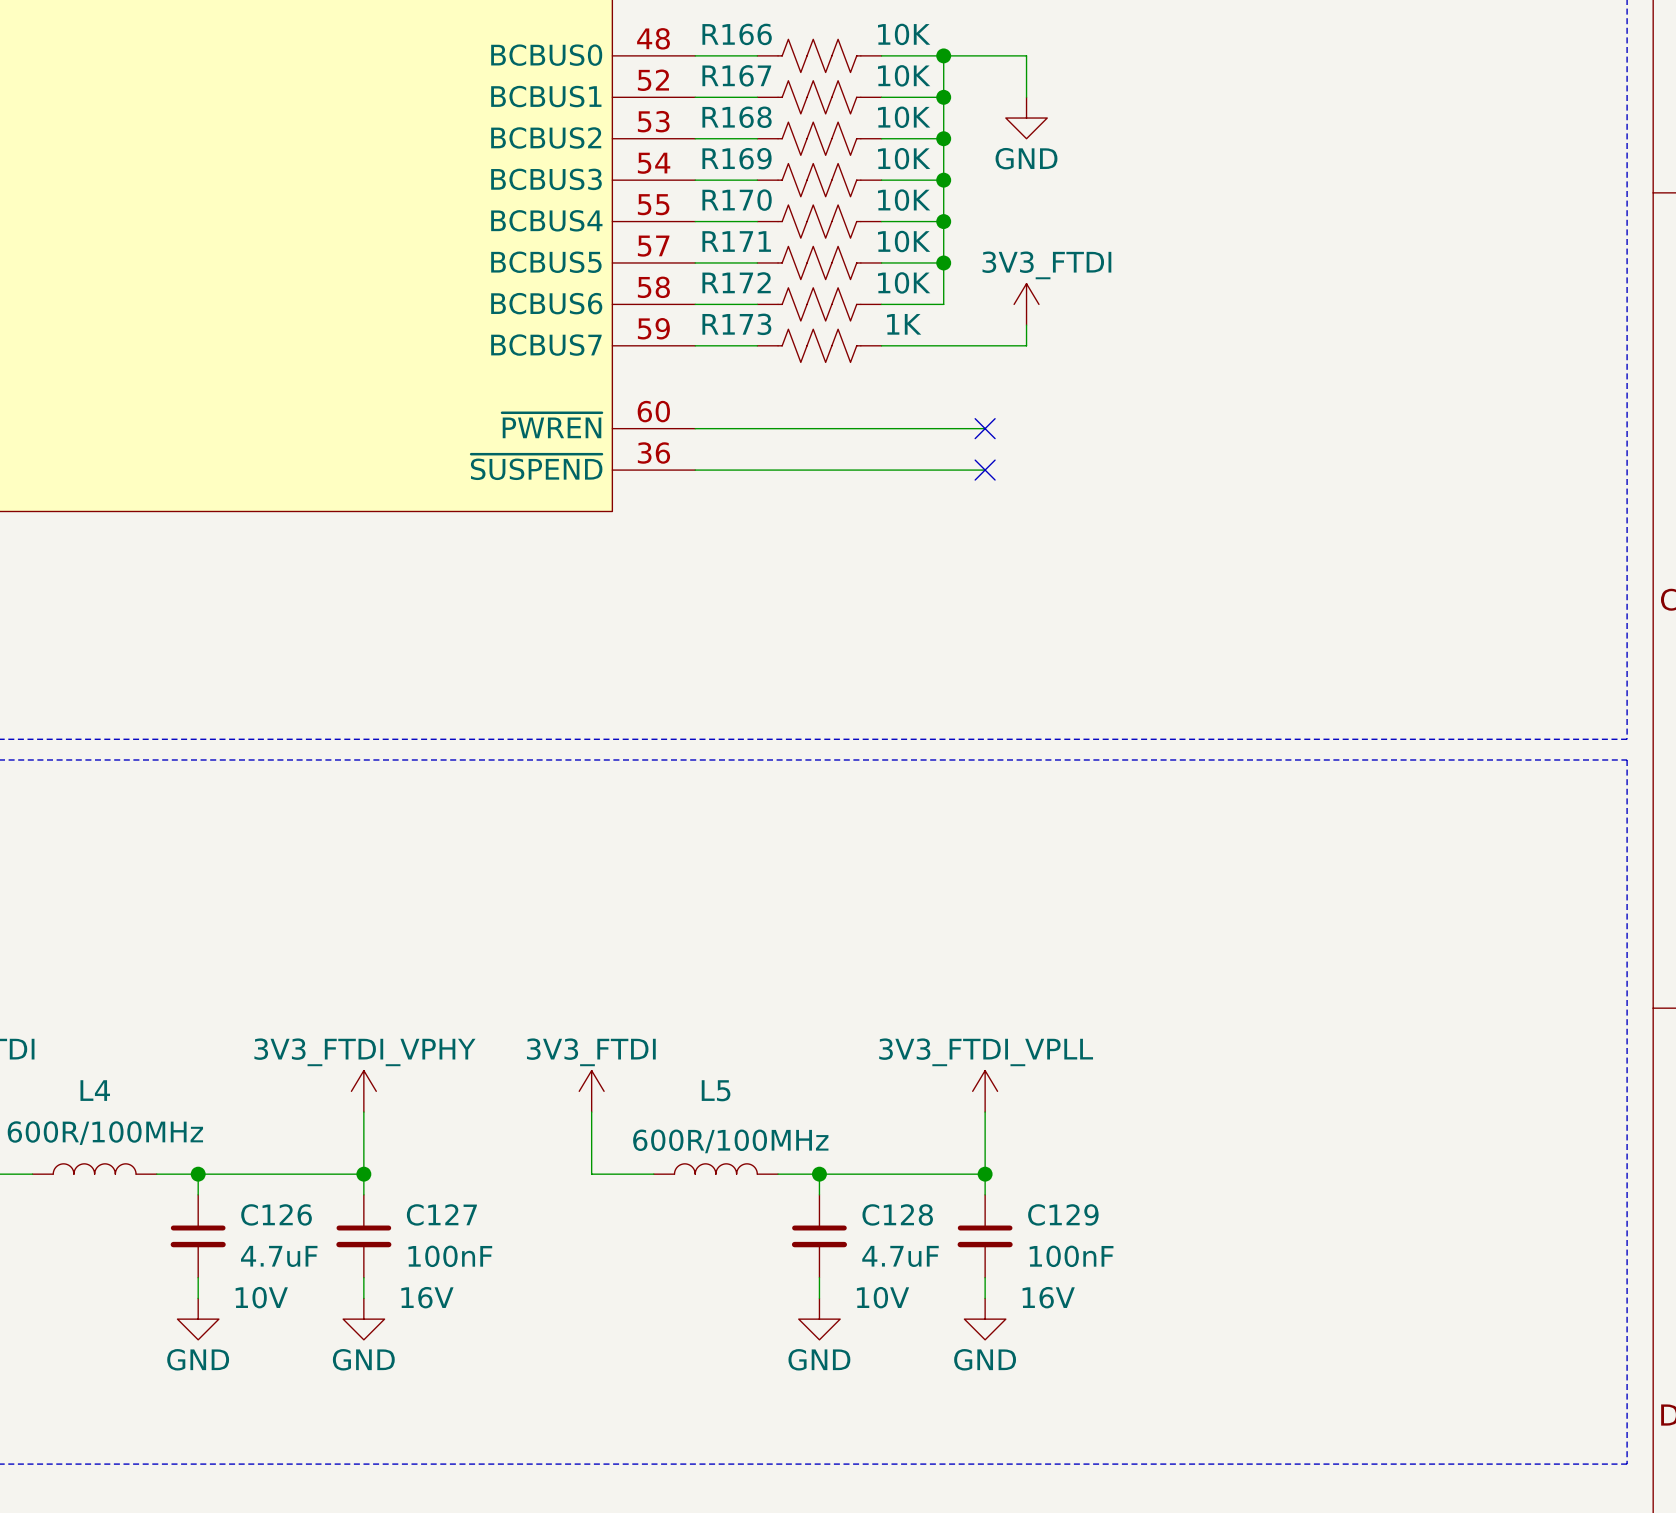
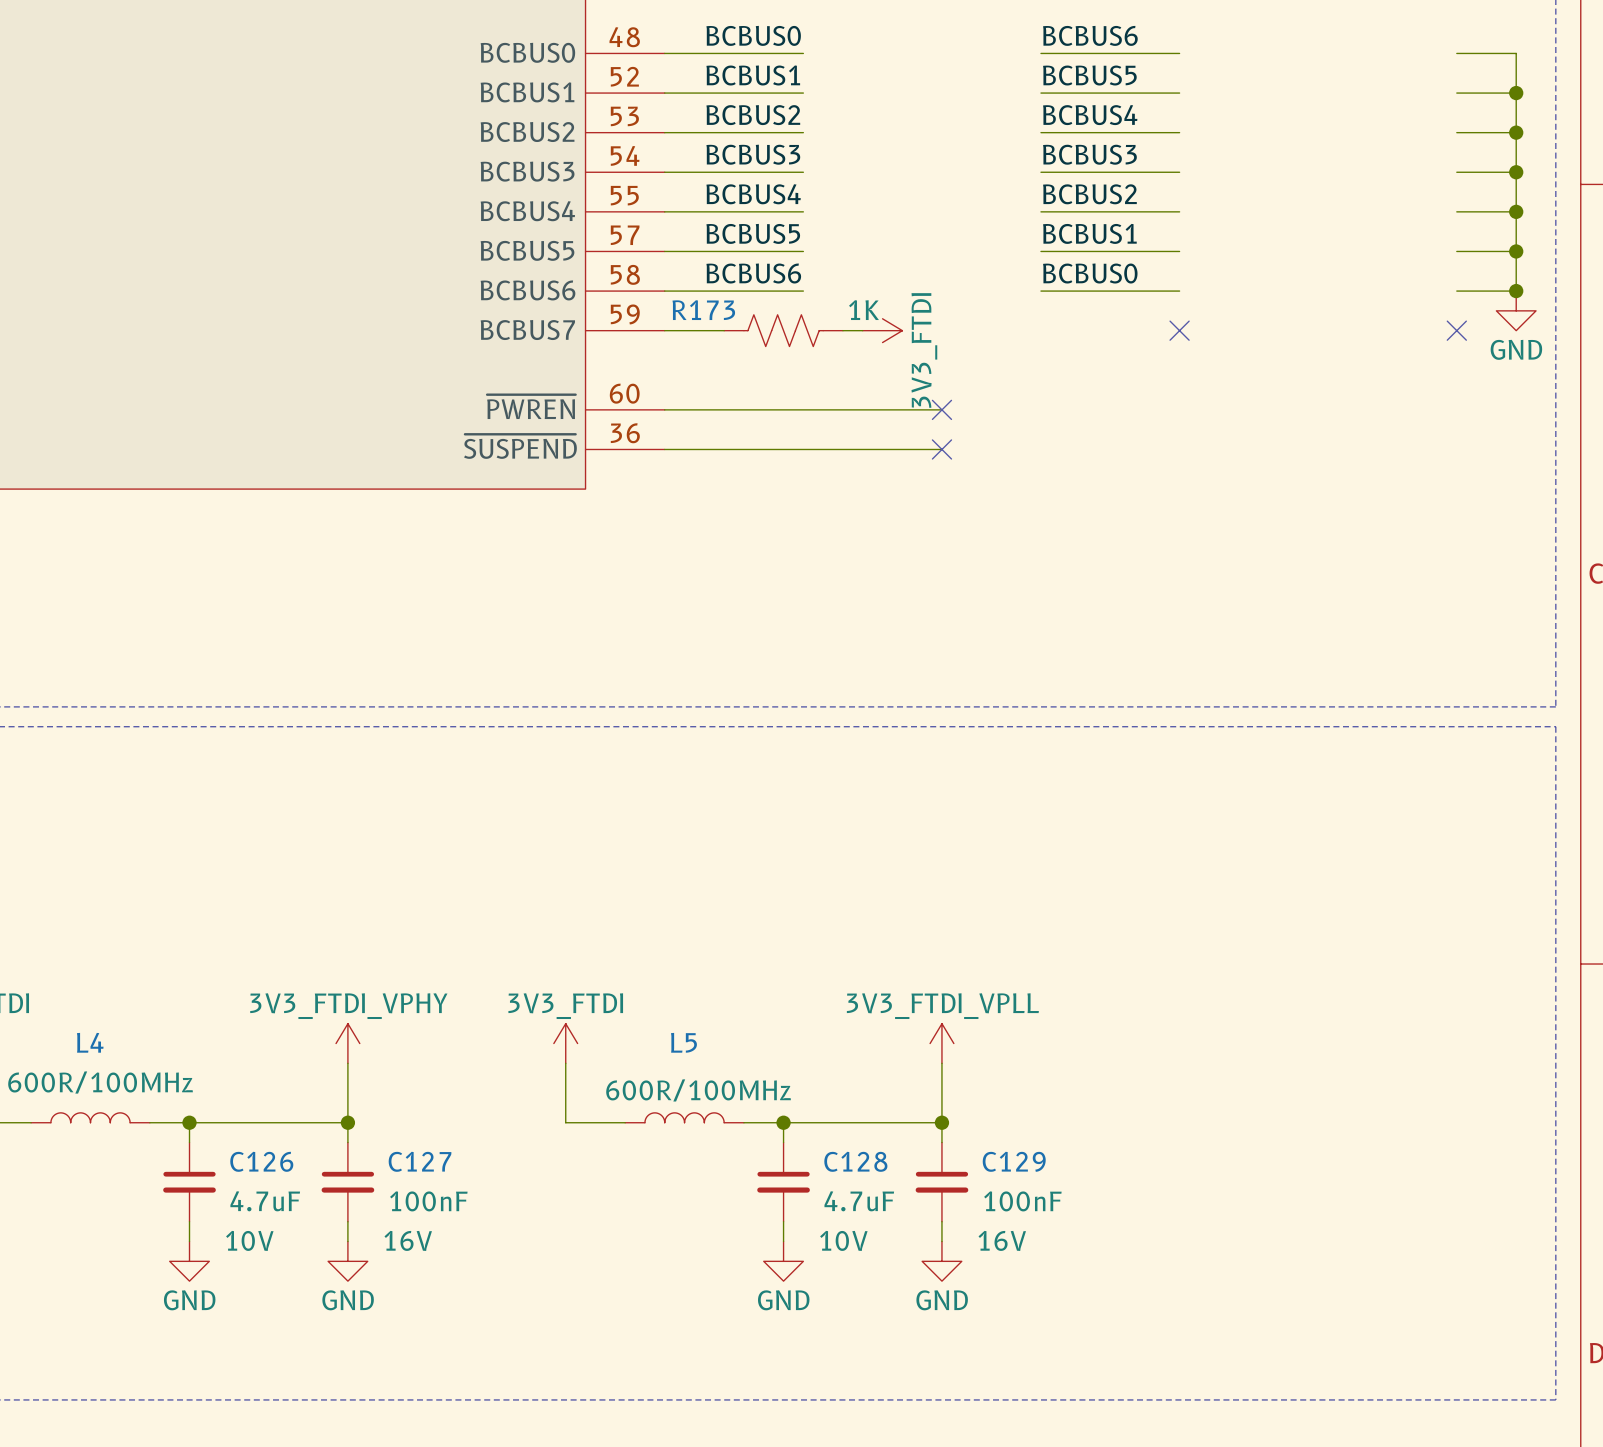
label: none -> BCBUS0 (753, 35)
label: none -> BCBUS6 (1090, 35)
wire: none -> (724, 53) (803, 53)
R166: 10K (819, 55) -> none
wire: (881, 55) (1026, 55) (1026, 97) -> none
wire: (943, 55) (943, 304) (881, 304) -> none
junction: (943, 55) -> none
wire: none -> (1040, 53) (1179, 53)
wire: none -> (1456, 53) (1516, 53) (1516, 291) (1456, 291)
label: none -> BCBUS1 (753, 75)
label: none -> BCBUS5 (1089, 75)
wire: none -> (724, 93) (803, 93)
R167: 10K (819, 97) -> none
wire: (881, 97) (943, 97) -> none
junction: (943, 97) -> none
wire: none -> (1040, 93) (1179, 93)
wire: none -> (1456, 93) (1516, 93)
junction: none -> (1516, 93)
power symbol: GND (1026, 118) -> none
label: none -> BCBUS2 (753, 115)
label: none -> BCBUS4 (1090, 115)
wire: none -> (724, 132) (803, 132)
R168: 10K (819, 138) -> none
wire: (881, 138) (943, 138) -> none
junction: (943, 138) -> none
wire: none -> (1040, 132) (1179, 132)
wire: none -> (1456, 132) (1516, 132)
junction: none -> (1516, 132)
label: none -> BCBUS3 (753, 154)
label: none -> BCBUS3 (1089, 154)
wire: none -> (724, 172) (803, 172)
R169: 10K (819, 180) -> none
wire: (881, 180) (943, 180) -> none
junction: (943, 180) -> none
wire: none -> (1040, 172) (1179, 172)
wire: none -> (1456, 172) (1516, 172)
junction: none -> (1516, 172)
label: none -> BCBUS4 (753, 194)
label: none -> BCBUS2 (1089, 194)
wire: none -> (724, 211) (803, 211)
R170: 10K (819, 221) -> none
wire: (881, 221) (943, 221) -> none
junction: (943, 221) -> none
wire: none -> (1040, 211) (1179, 211)
wire: none -> (1456, 211) (1516, 211)
junction: none -> (1516, 211)
label: none -> BCBUS5 (753, 233)
label: none -> BCBUS1 (1089, 233)
wire: none -> (724, 251) (803, 251)
R171: 10K (819, 262) -> none
wire: (881, 262) (943, 262) -> none
junction: (943, 262) -> none
wire: none -> (1040, 251) (1179, 251)
wire: none -> (1456, 251) (1516, 251)
junction: none -> (1516, 251)
label: none -> BCBUS6 (753, 273)
label: none -> BCBUS0 (1090, 273)
wire: none -> (724, 291) (803, 291)
R172: 10K (819, 304) -> none
power symbol rotation: 0° (1026, 304) -> 90° clockwise (882, 330)
power symbol position: 3V3_FTDI (1026, 304) -> 3V3_FTDI (882, 330)
wire: none -> (1040, 291) (1179, 291)
junction: none -> (1516, 291)
wire: (1026, 325) (1026, 345) (902, 345) -> none
power symbol: none -> GND (1516, 310)
no-connect mark: none -> (1179, 330)
no-connect mark: none -> (1456, 330)

